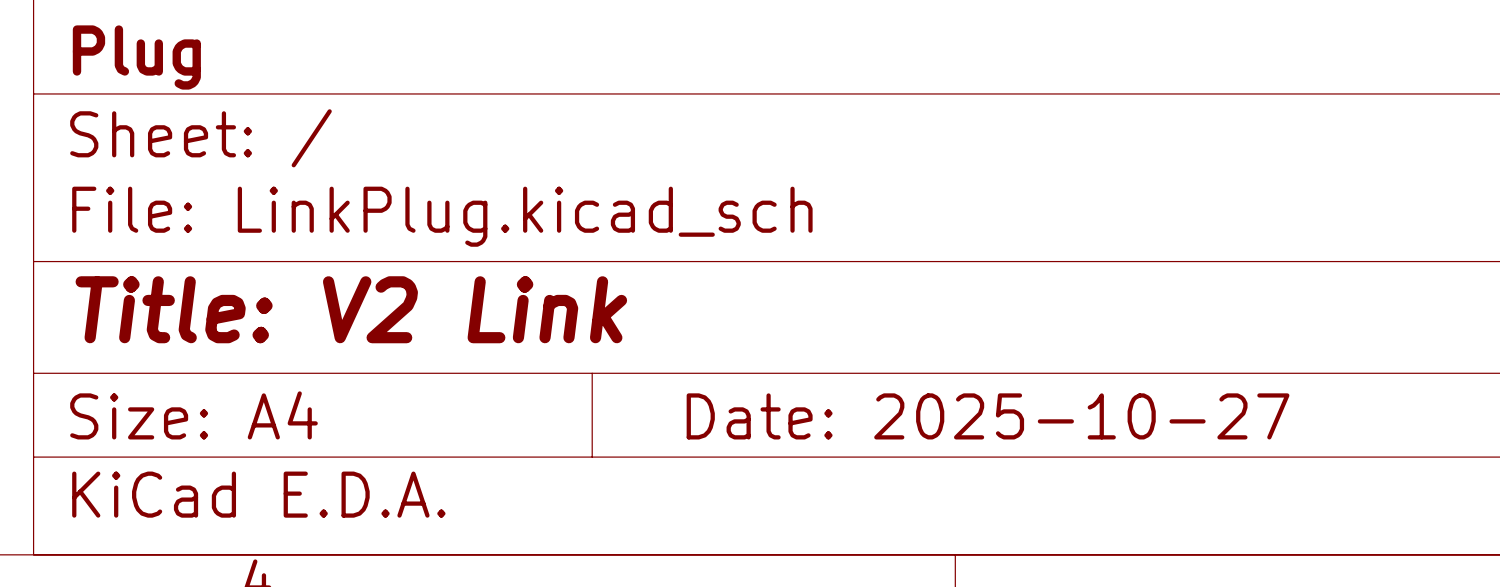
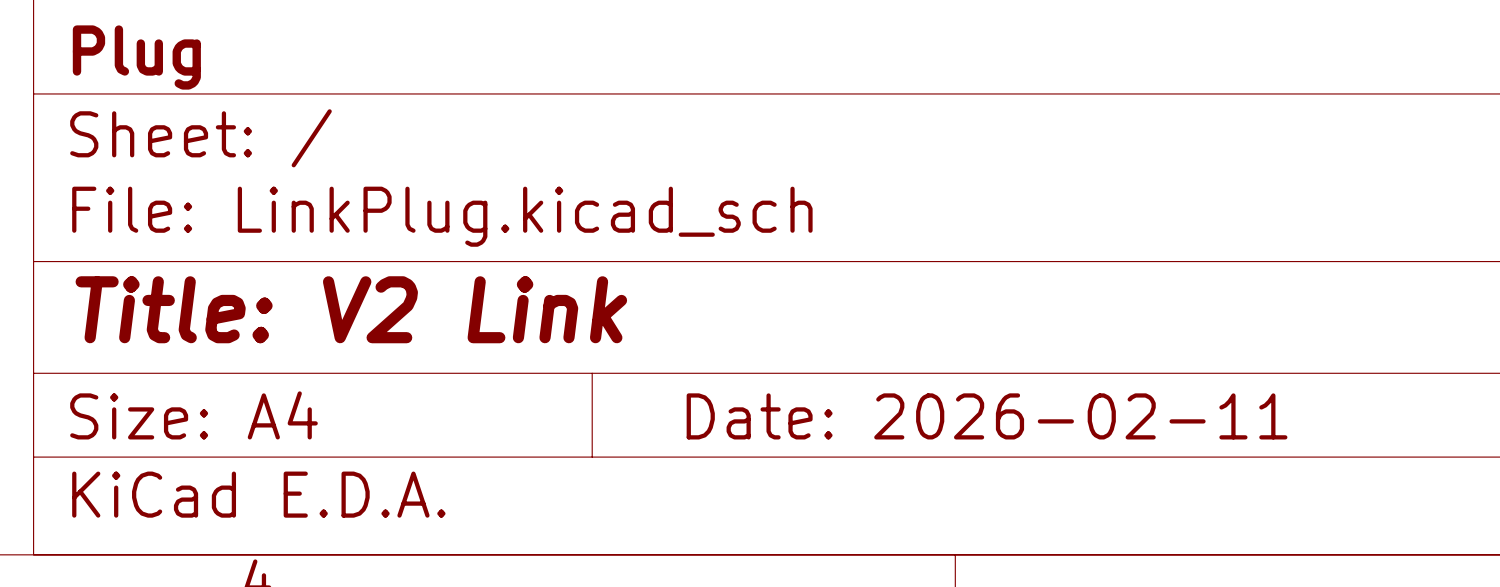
title block: Date: 2025-10-27 (988, 416) -> Date: 2026-02-11 (987, 416)

